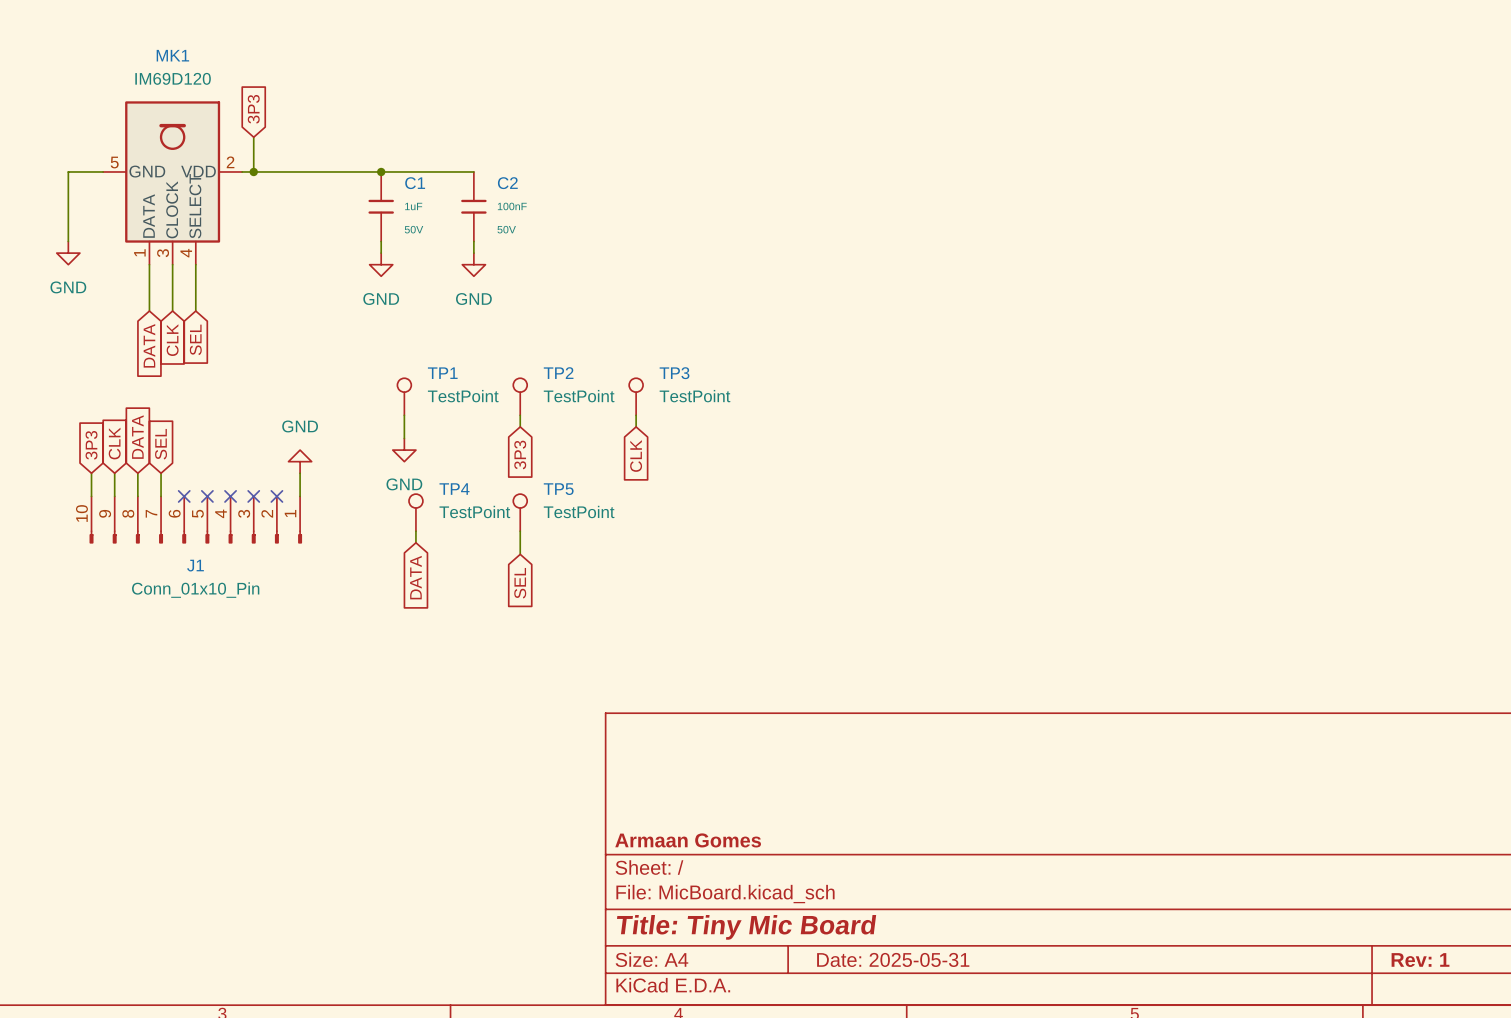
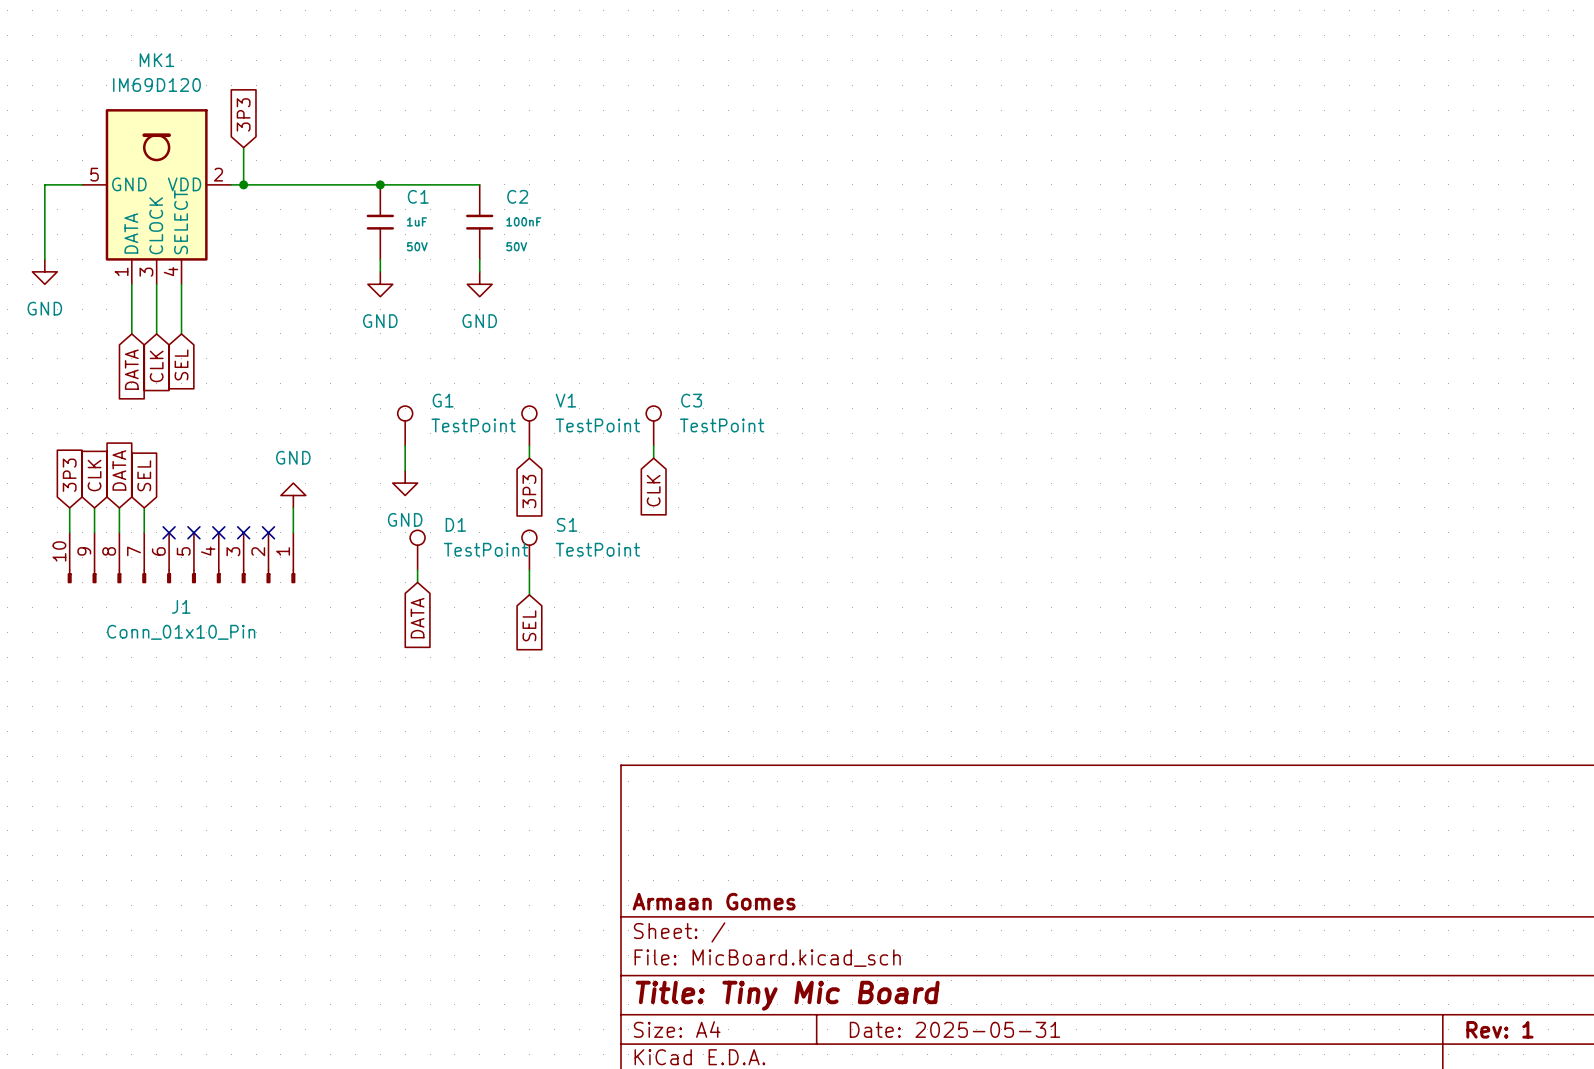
TP1 name: TP1 (442, 373) -> G1 (443, 400)
TP2 name: TP2 (558, 373) -> V1 (565, 400)
TP3 name: TP3 (674, 373) -> C3 (691, 400)
TP4 name: TP4 (454, 489) -> D1 (455, 524)
TP5 name: TP5 (558, 489) -> S1 (567, 524)

